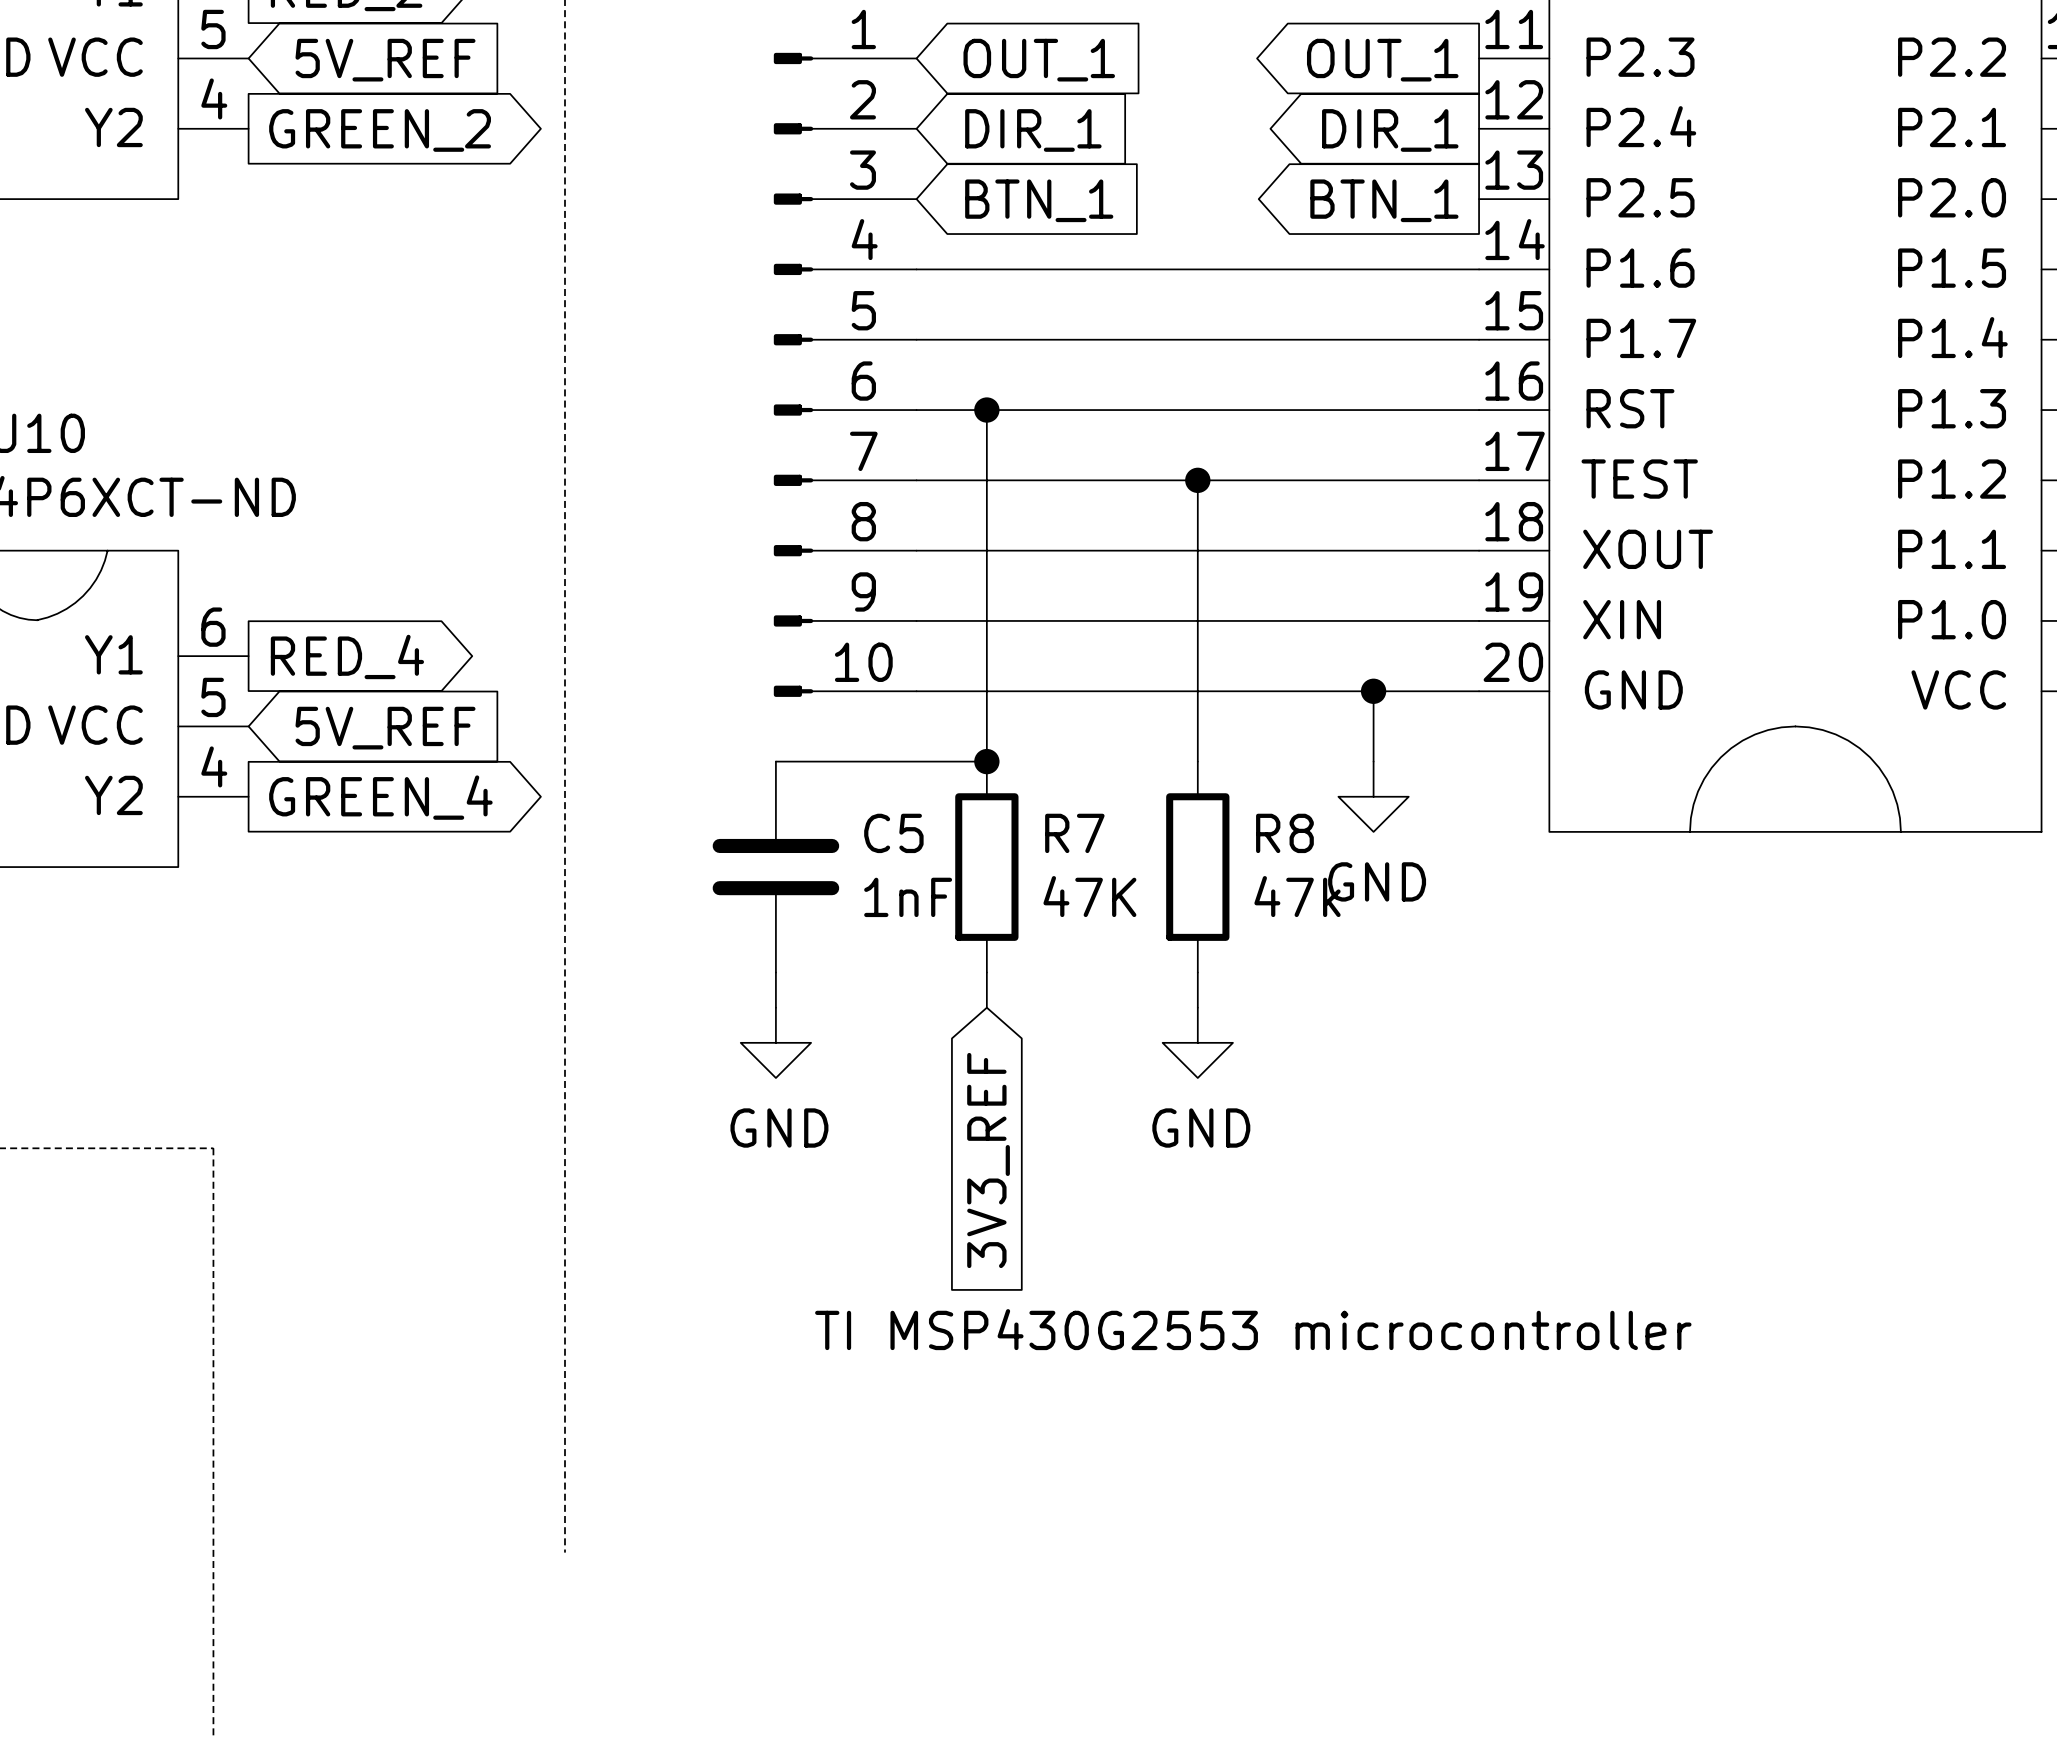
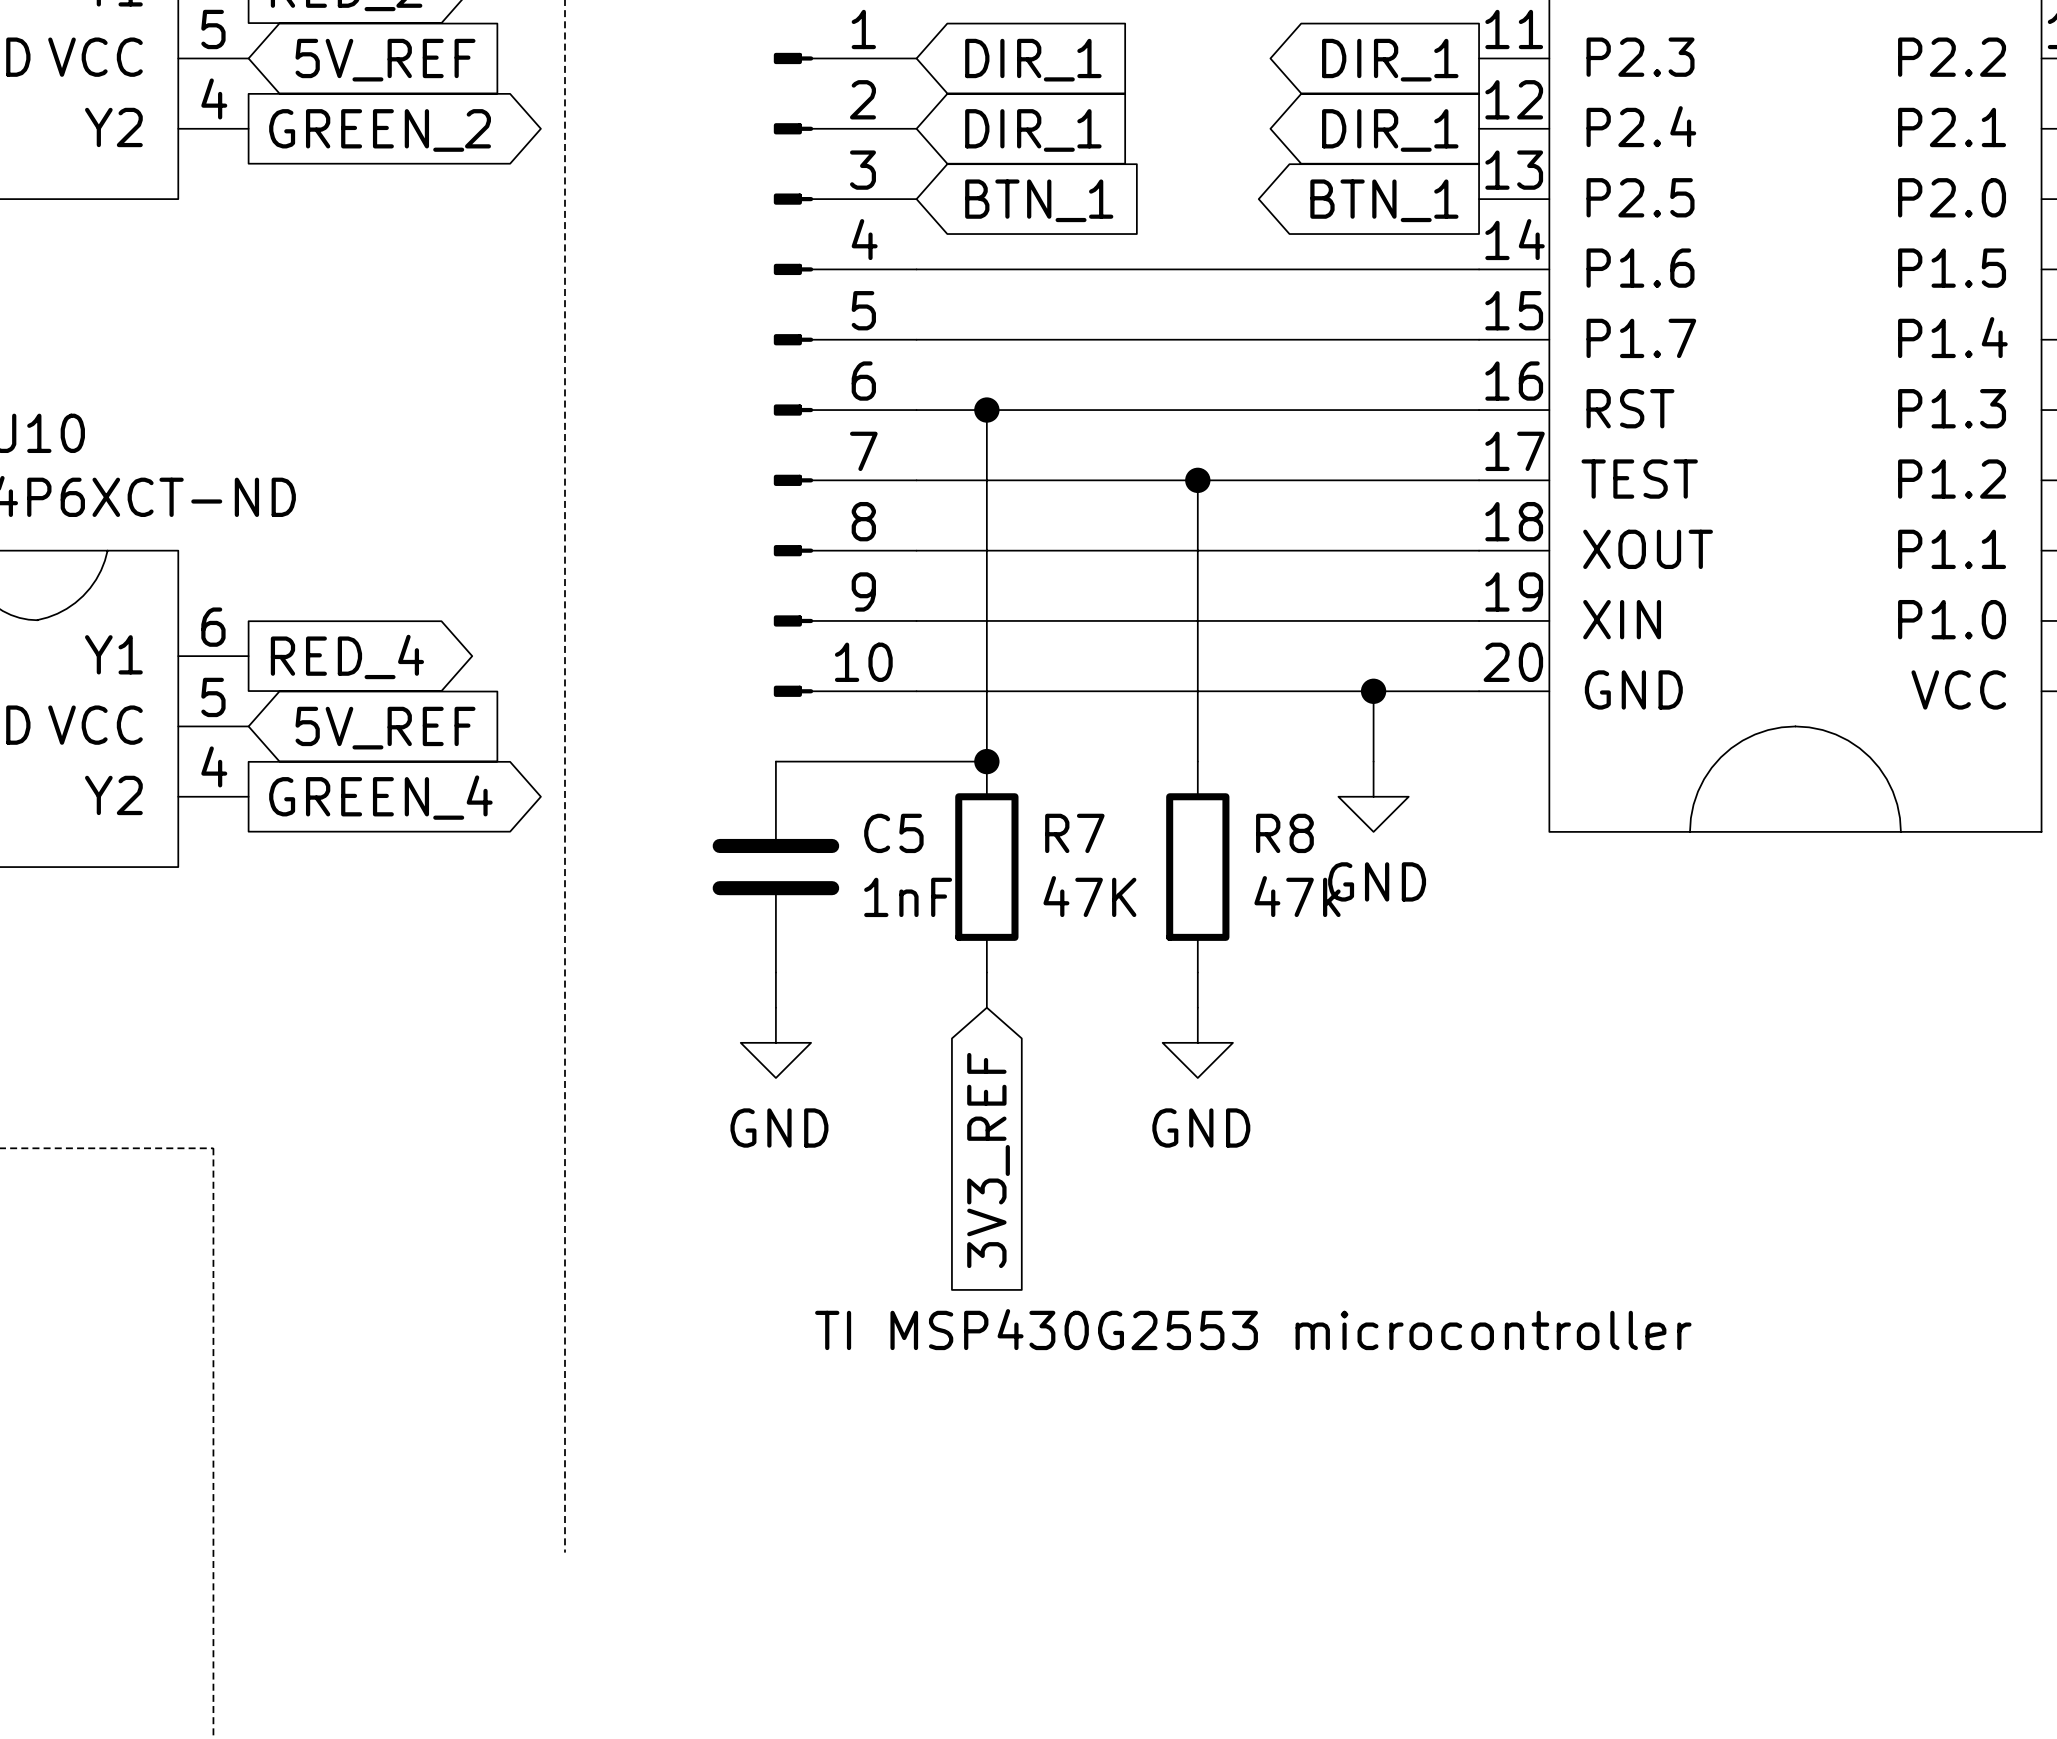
global label: OUT_1 (1039, 60) -> DIR_1 (1033, 60)
global label: OUT_1 (1382, 60) -> DIR_1 (1390, 60)

